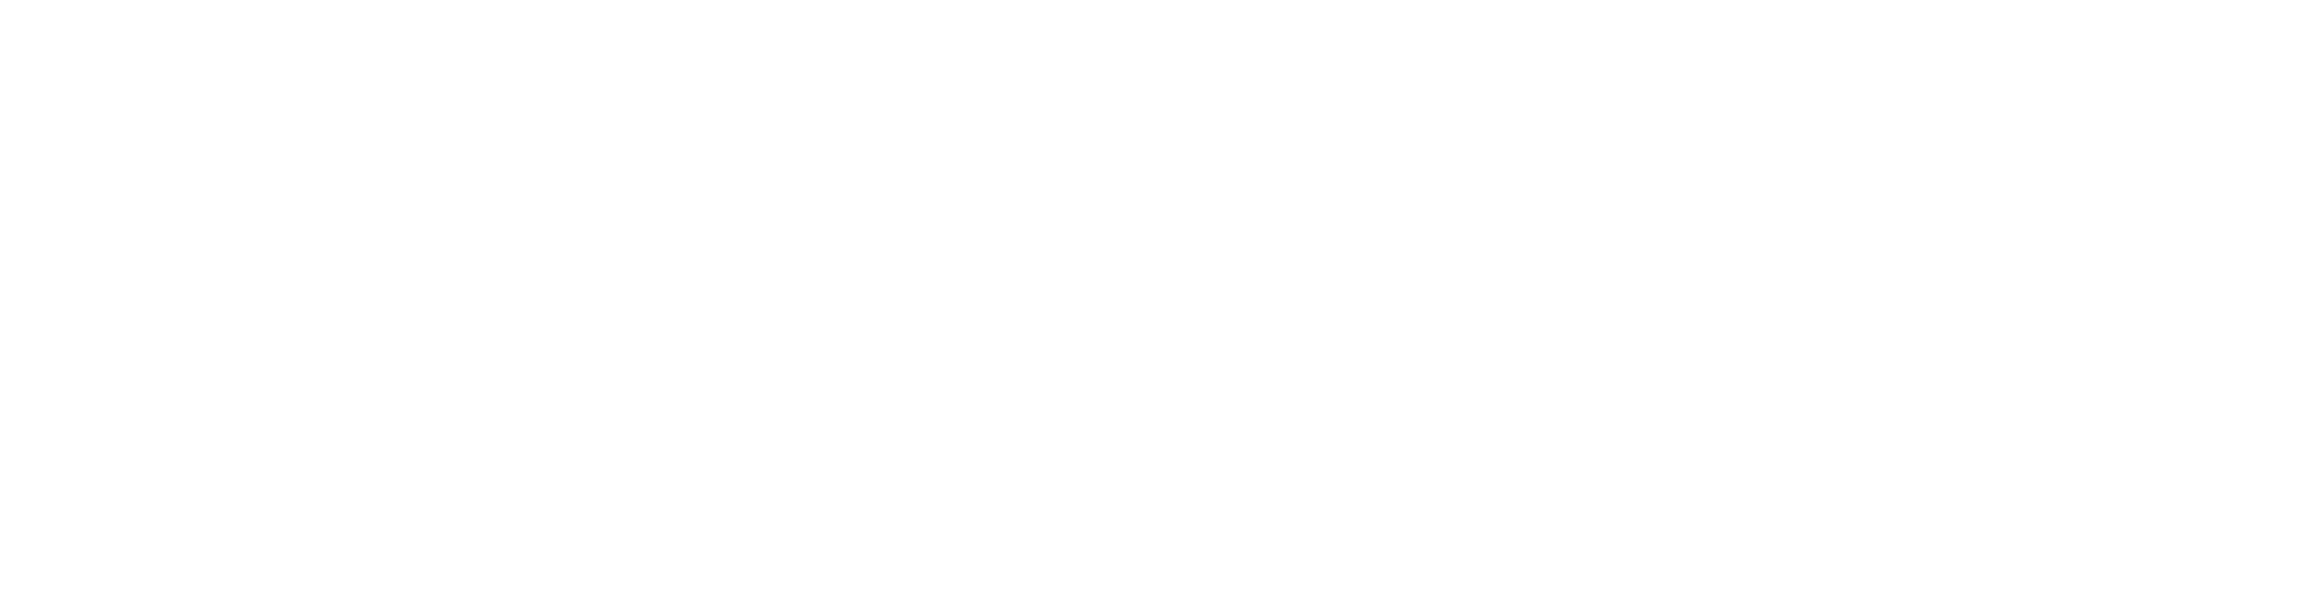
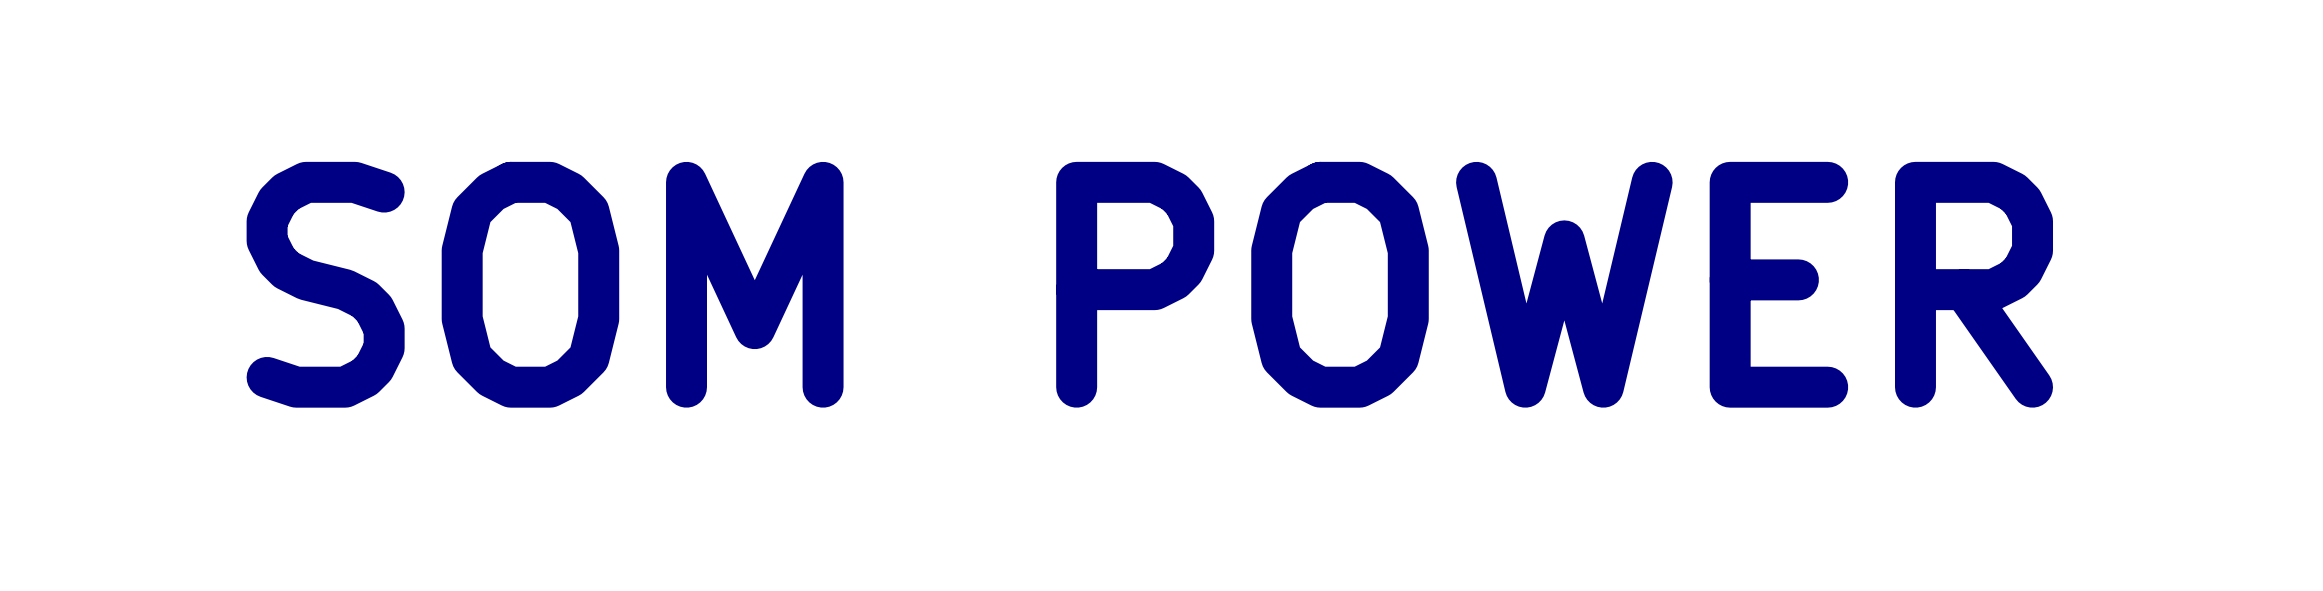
text: none -> SOM POWER (1149, 284)

